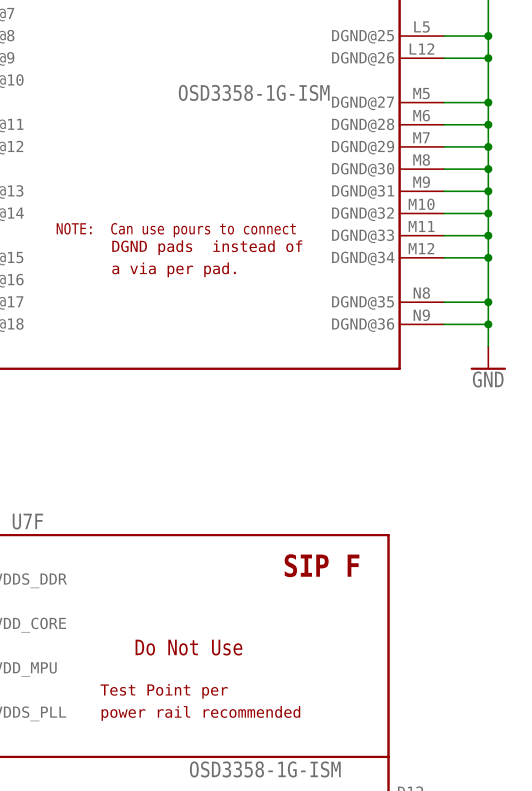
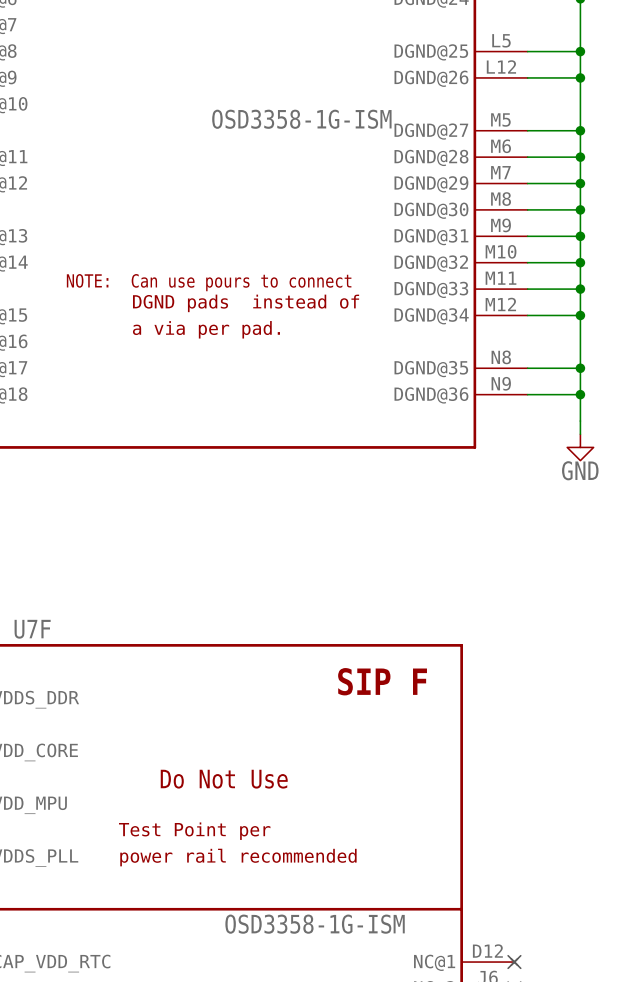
power symbol: GND (488, 358) -> none
power symbol: none -> GND (580, 447)

